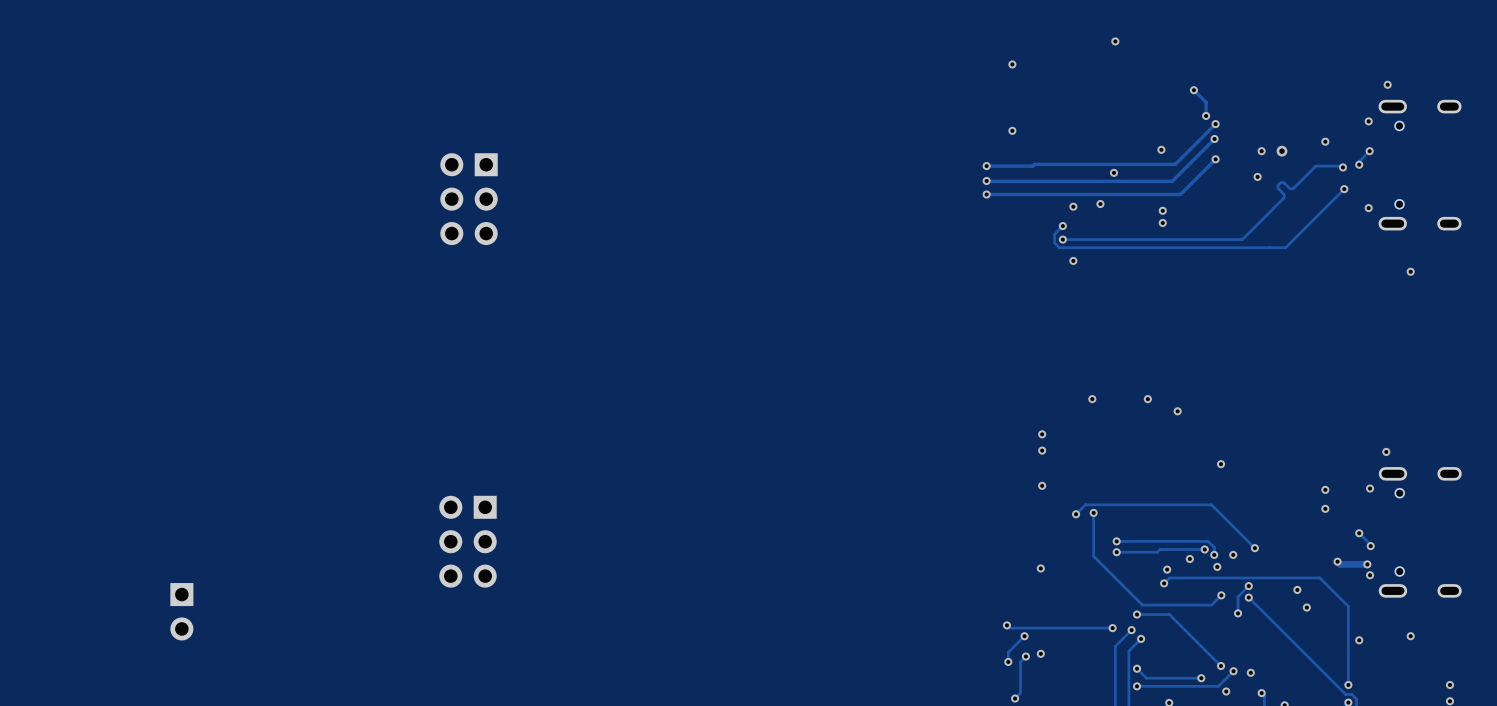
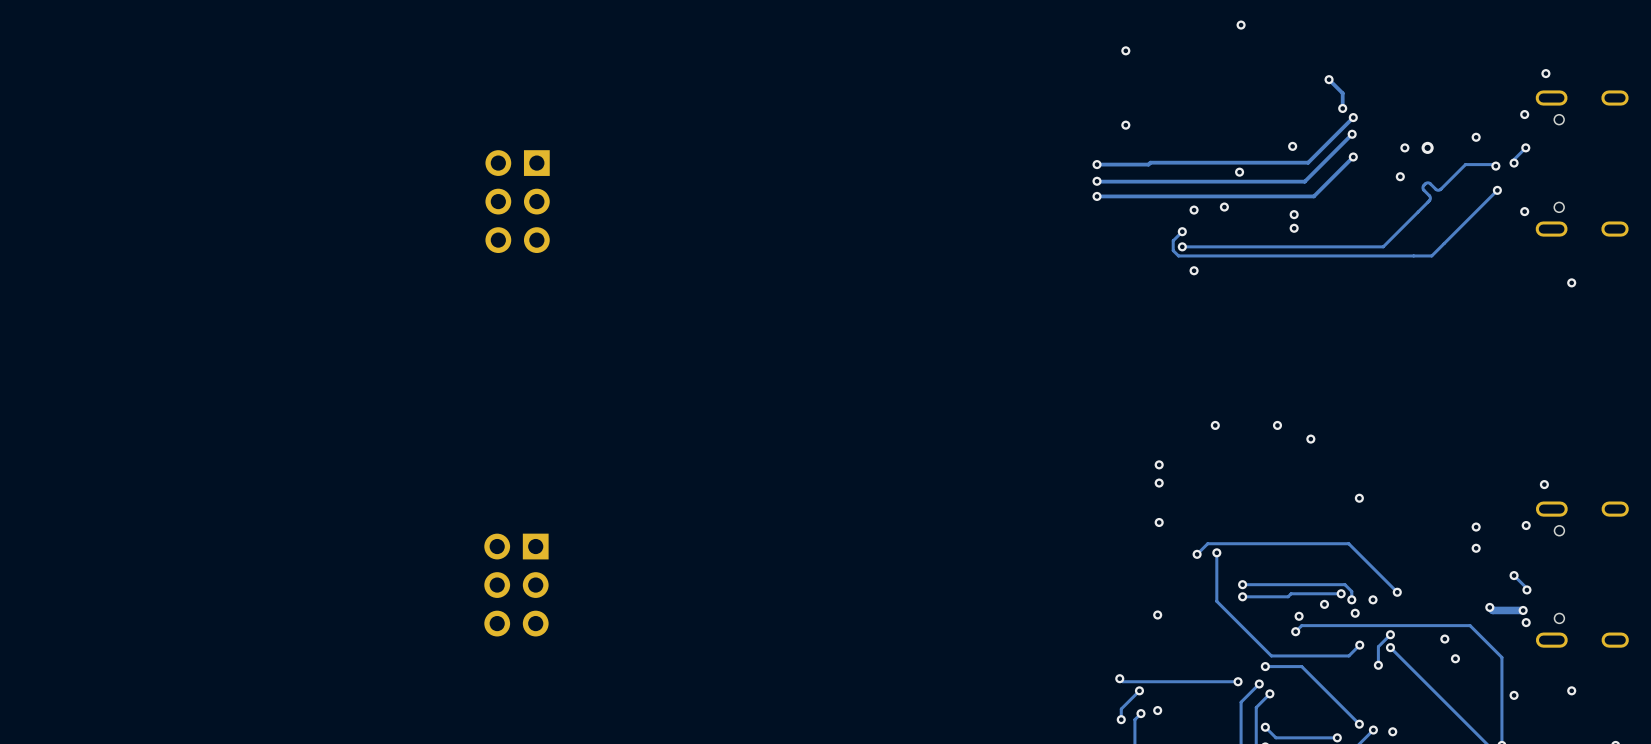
part: (181, 611) -> none

